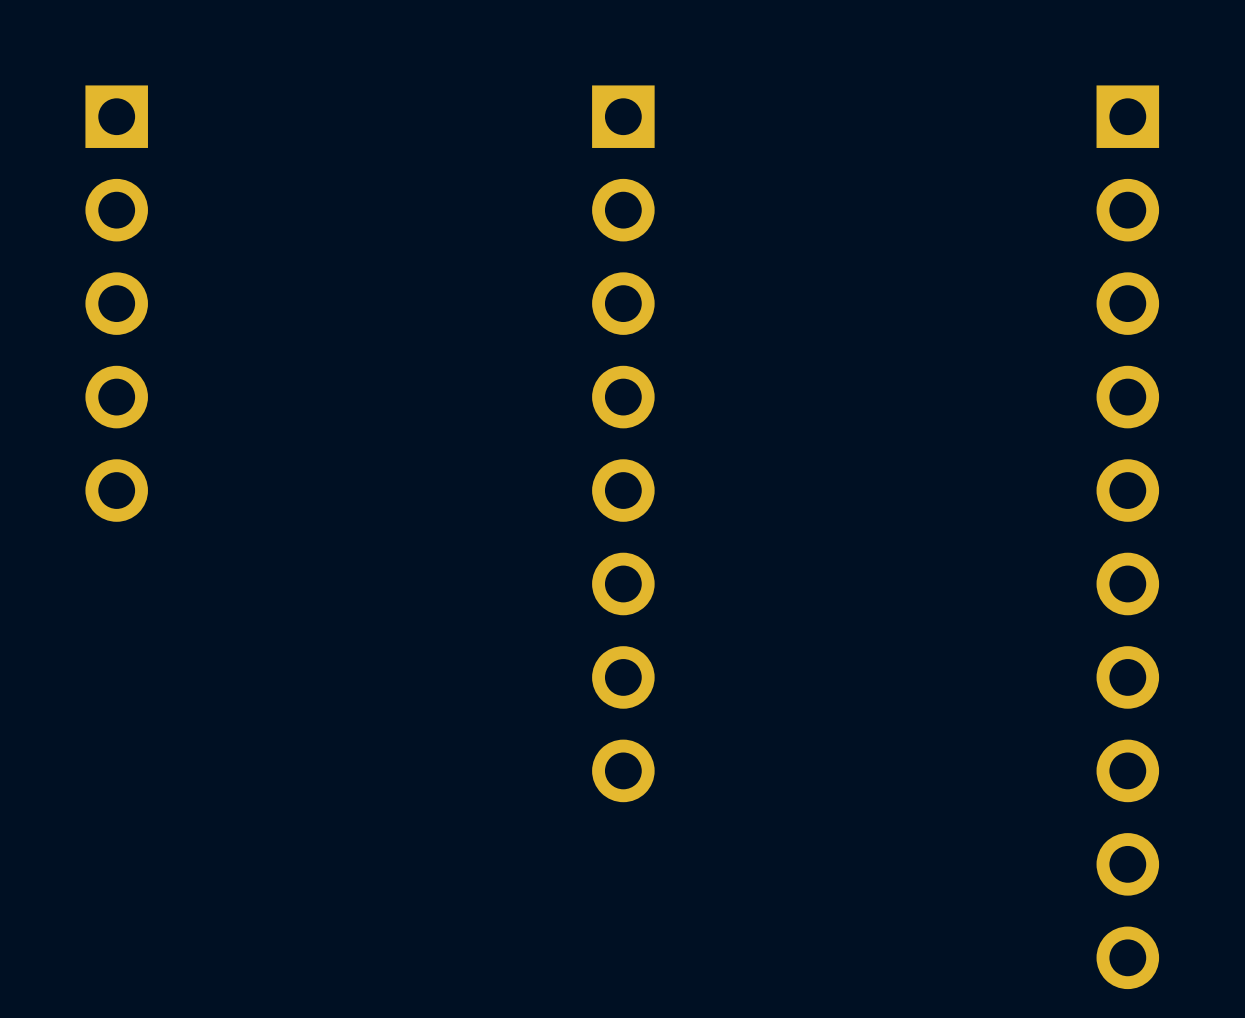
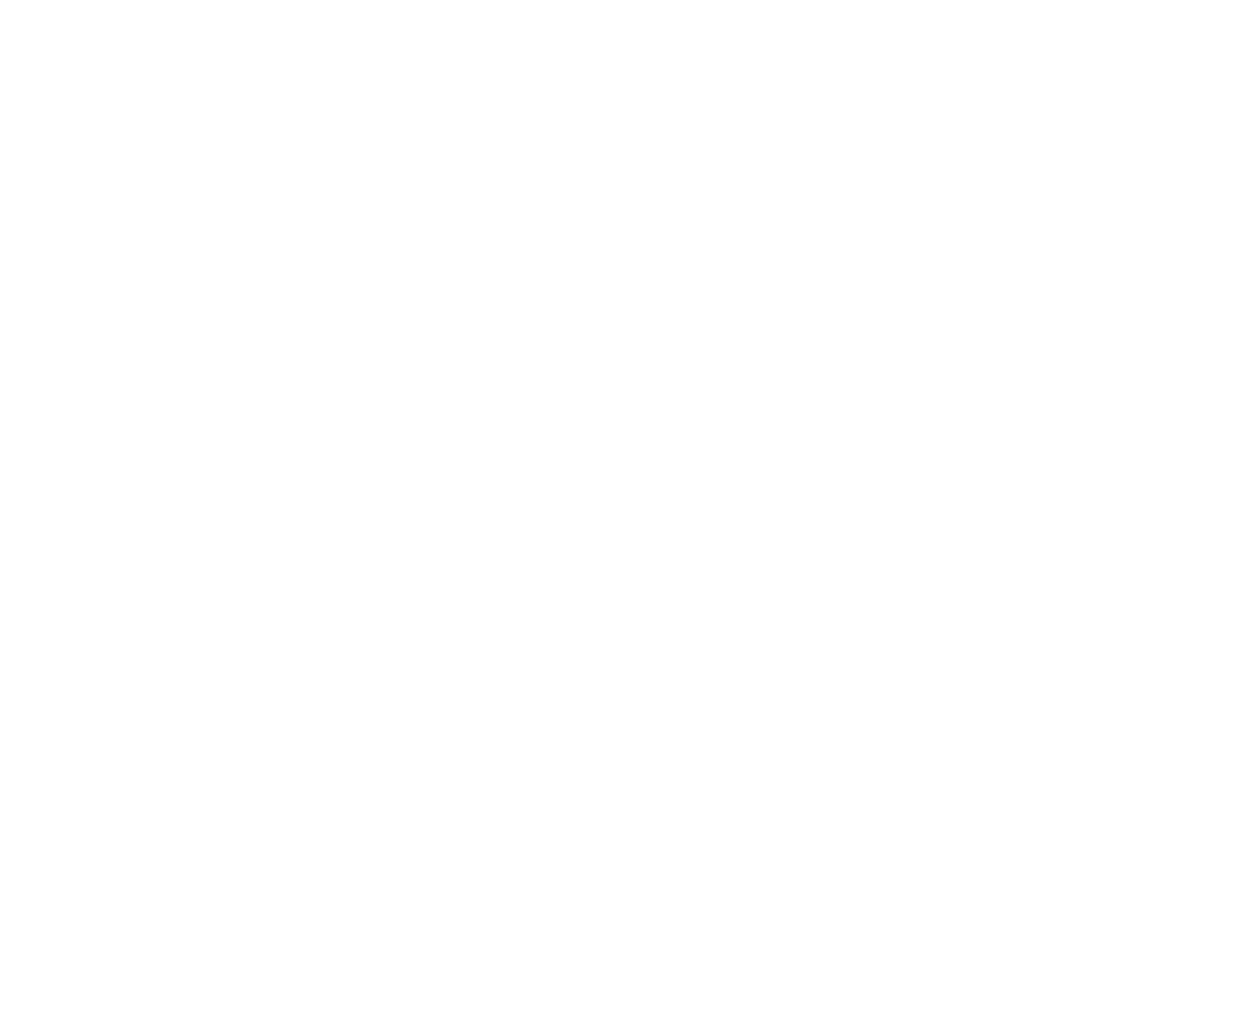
part: (116, 303) -> none
part: (623, 443) -> none
part: (1127, 537) -> none

